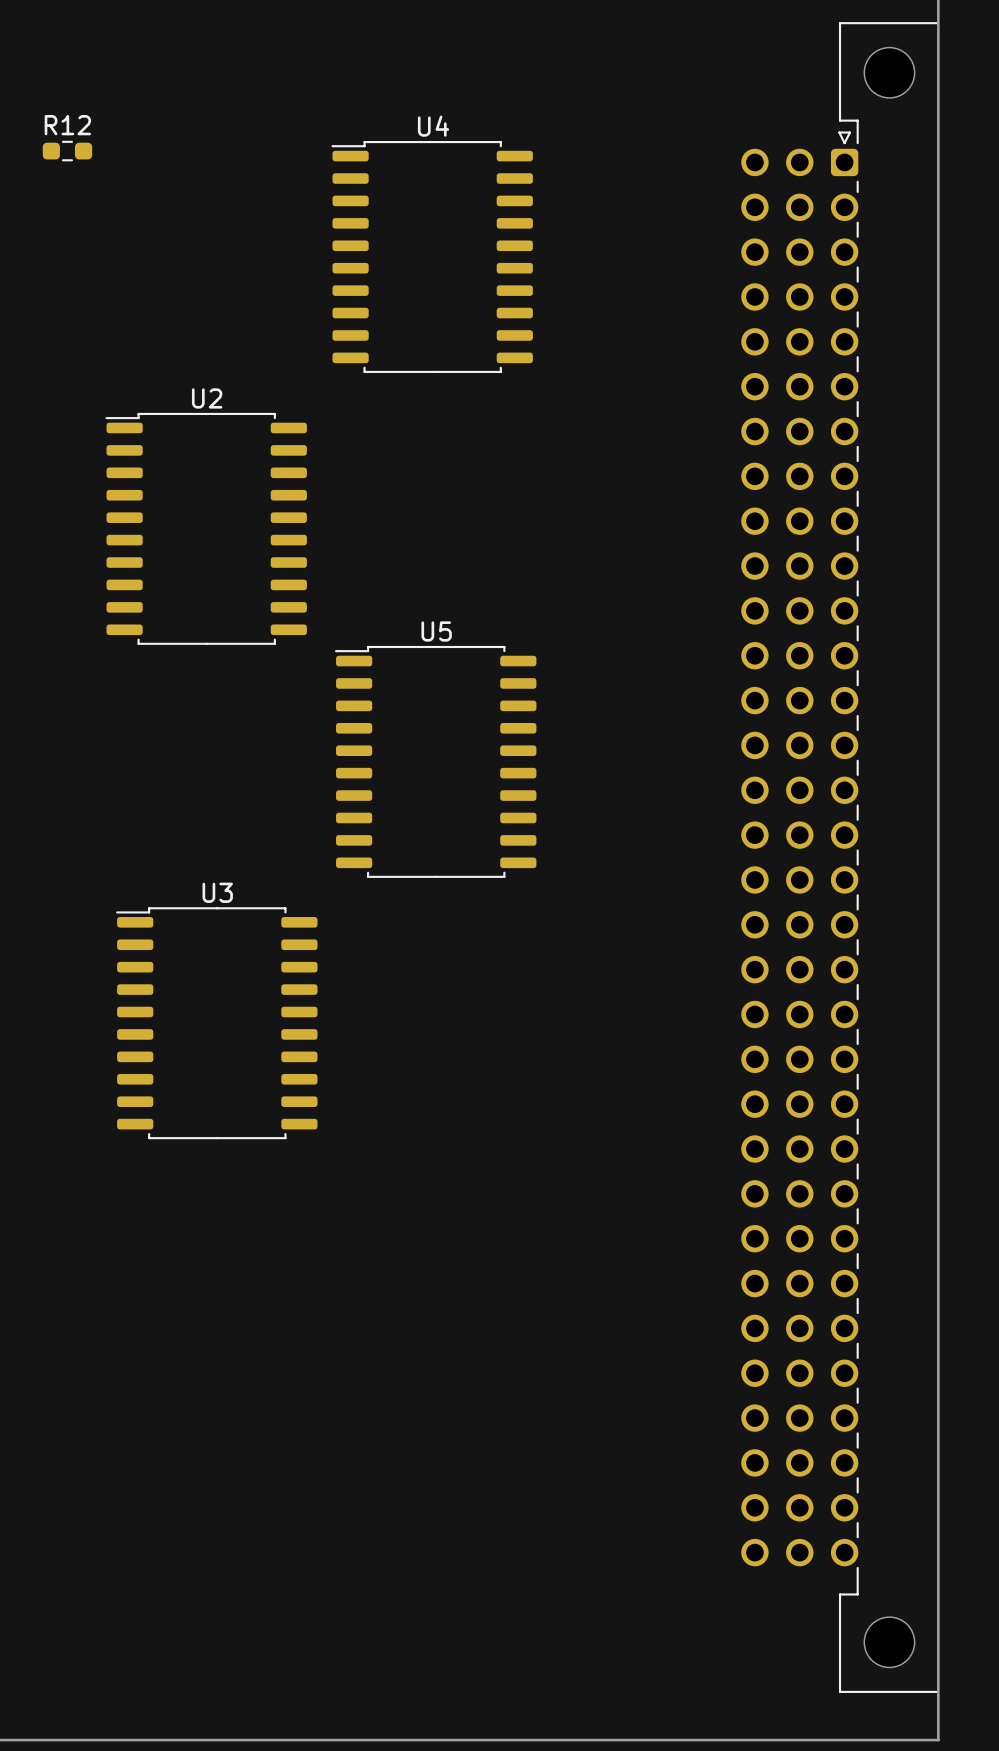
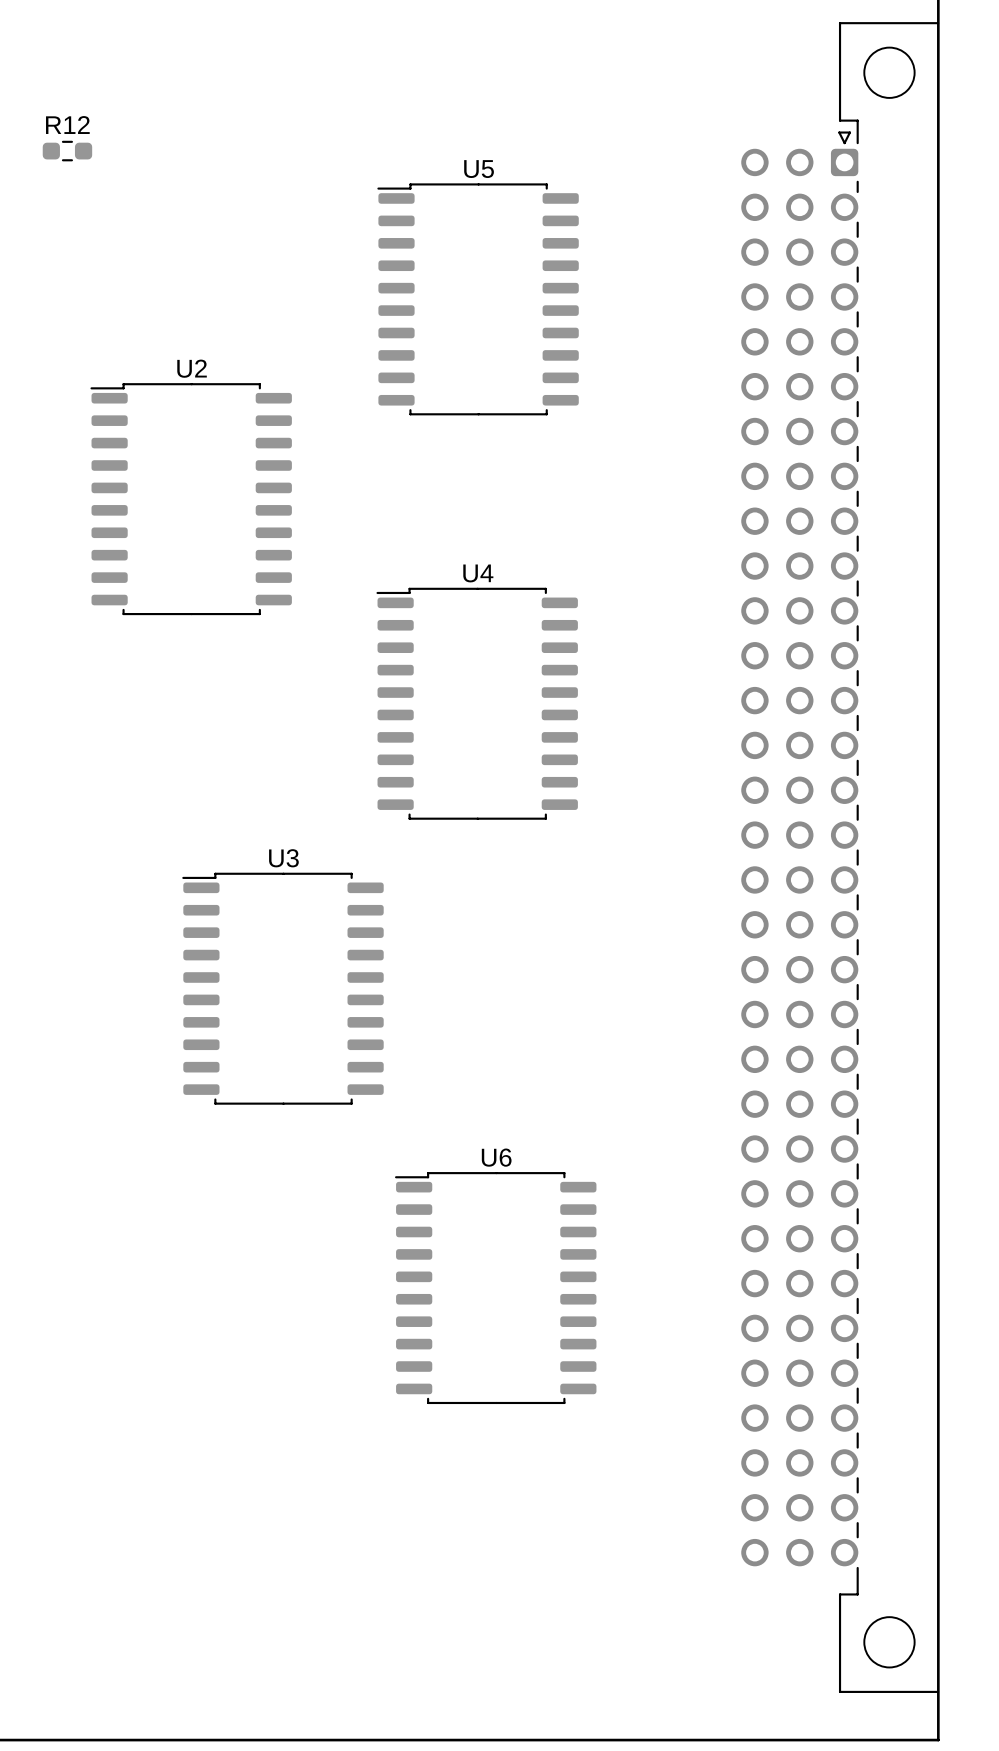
U4 position: (432, 256) -> (477, 703)
U2 position: (206, 528) -> (191, 499)
U5 position: (435, 761) -> (478, 299)
U3 position: (216, 1023) -> (282, 988)
U6: none -> (495, 1288)

